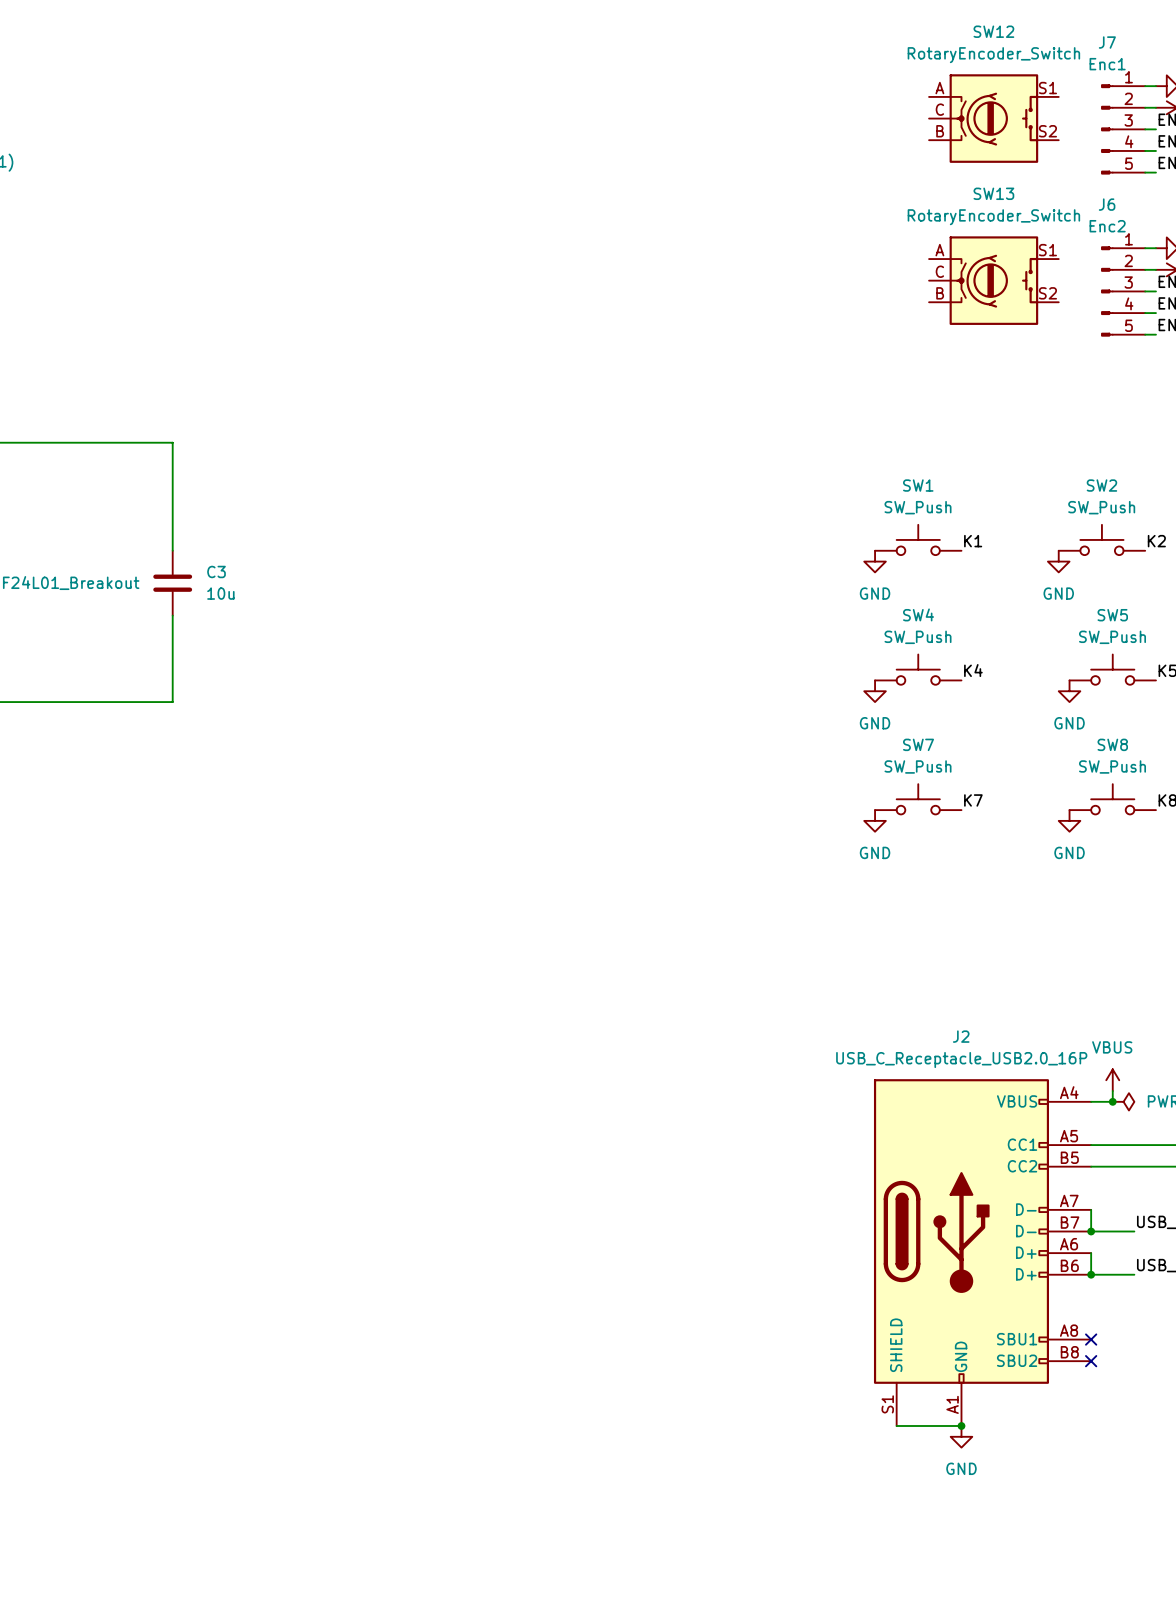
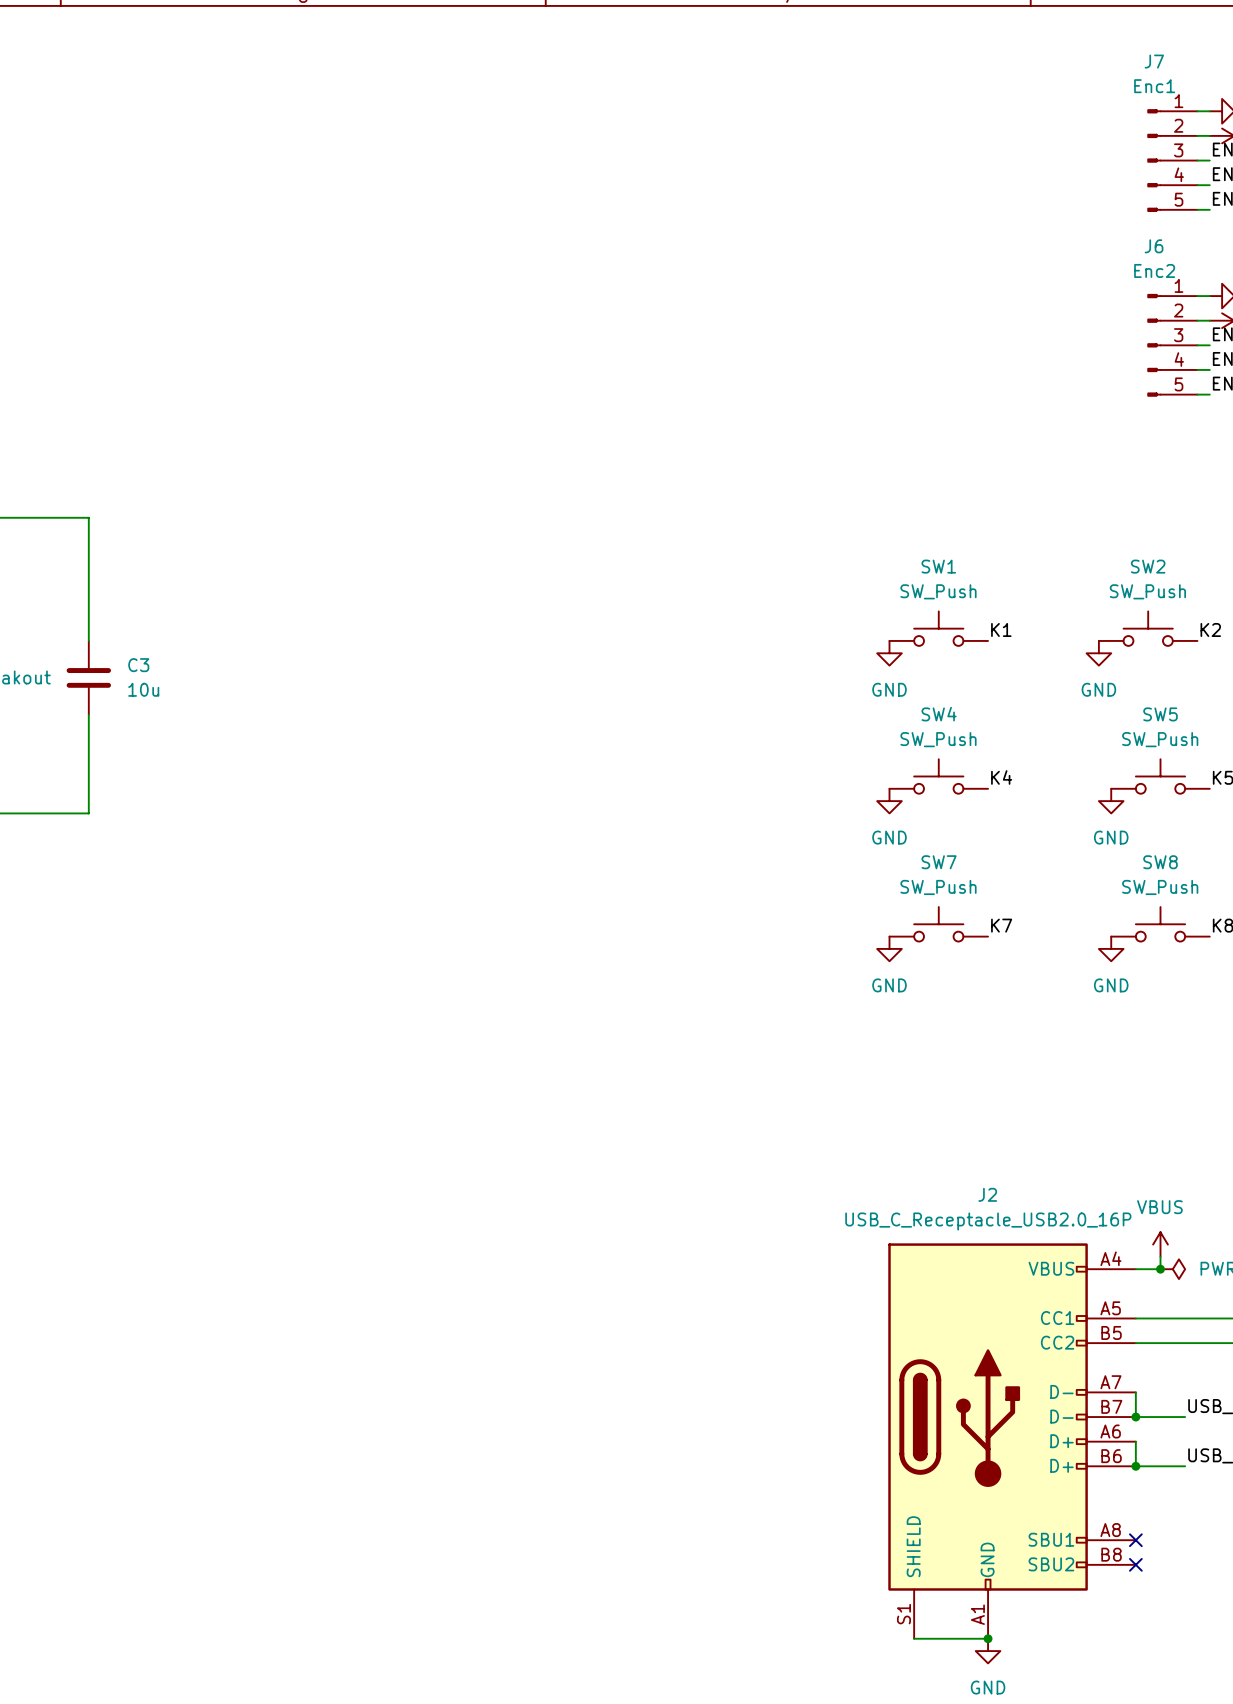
SW12: RotaryEncoder_Switch (993, 118) -> none
SW13: RotaryEncoder_Switch (993, 280) -> none

